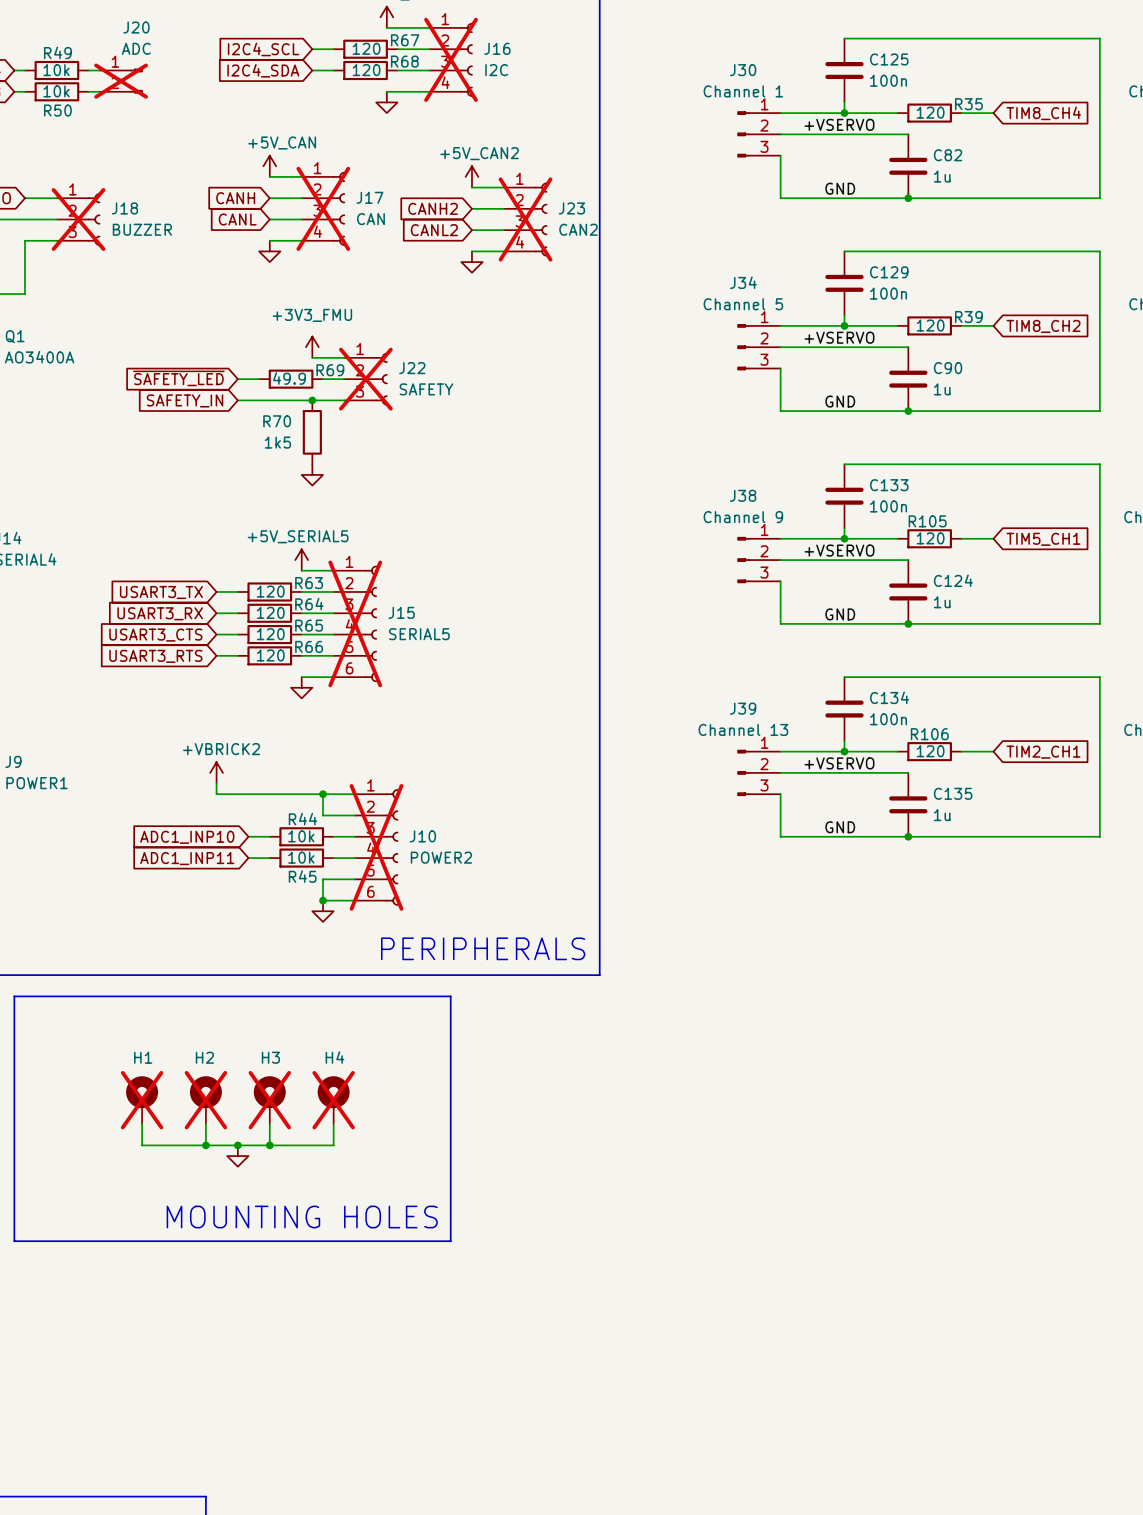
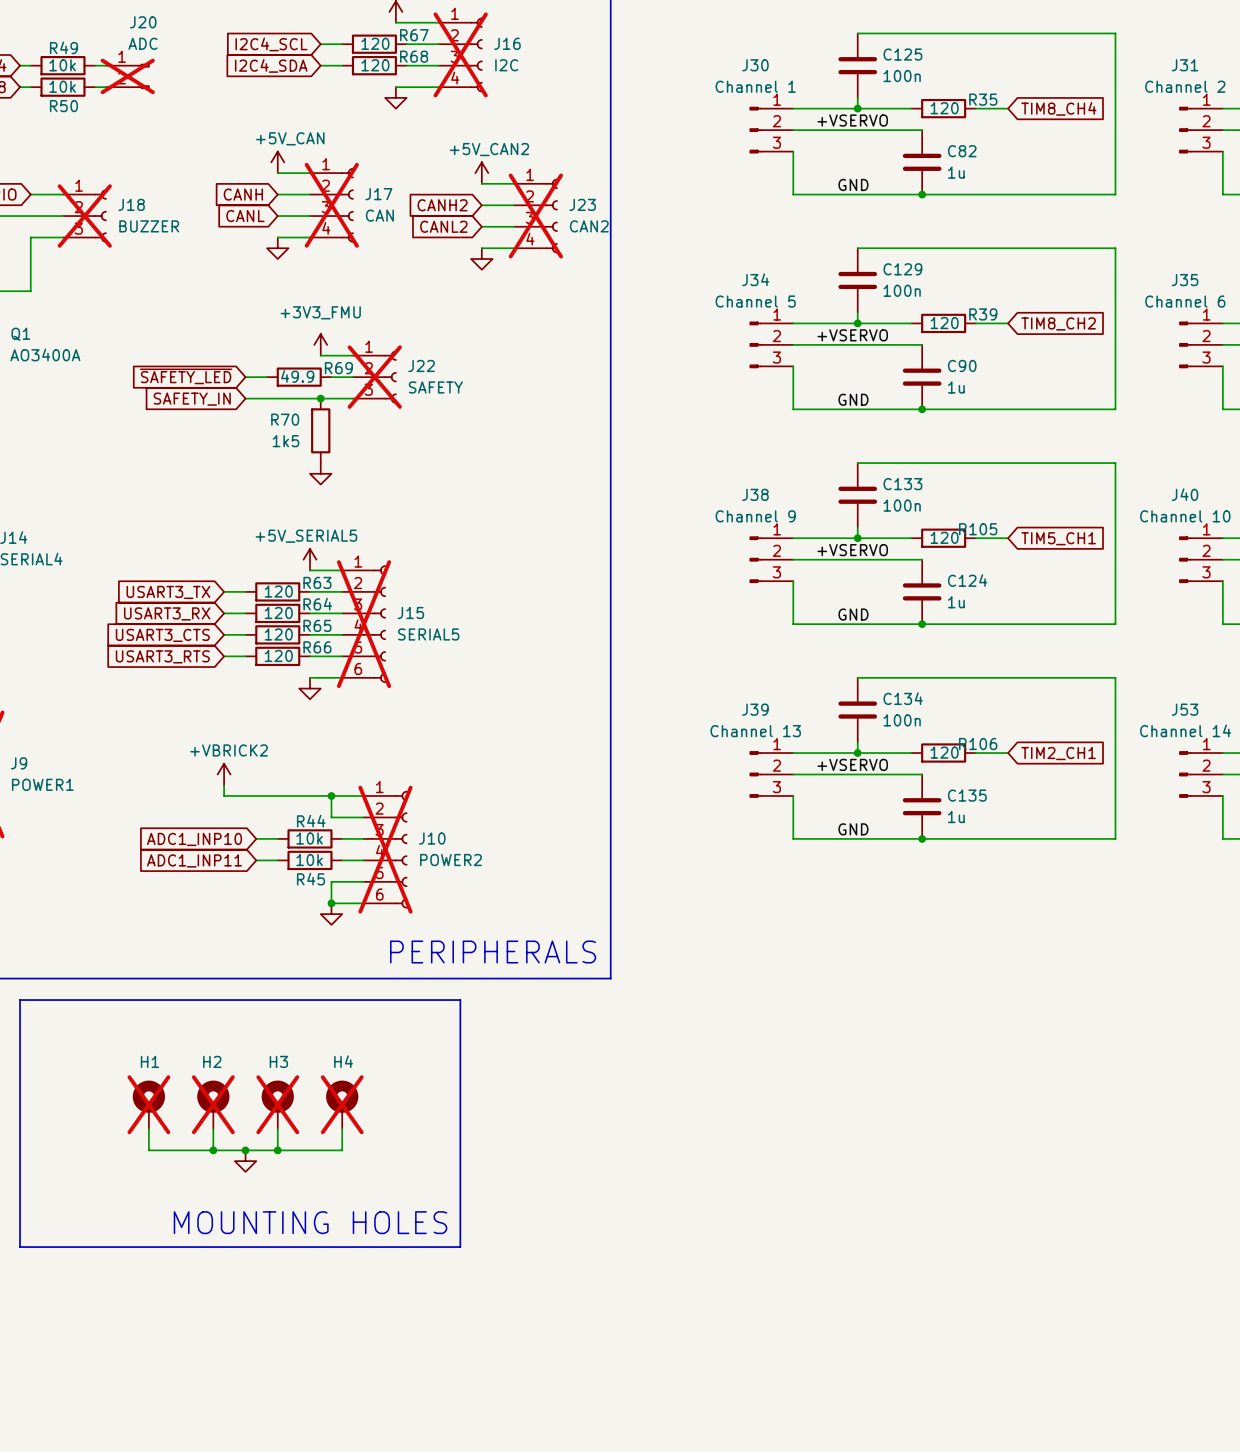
R105 name position: R105 (927, 521) -> R105 (978, 529)
R106 name position: R106 (929, 734) -> R106 (978, 744)

